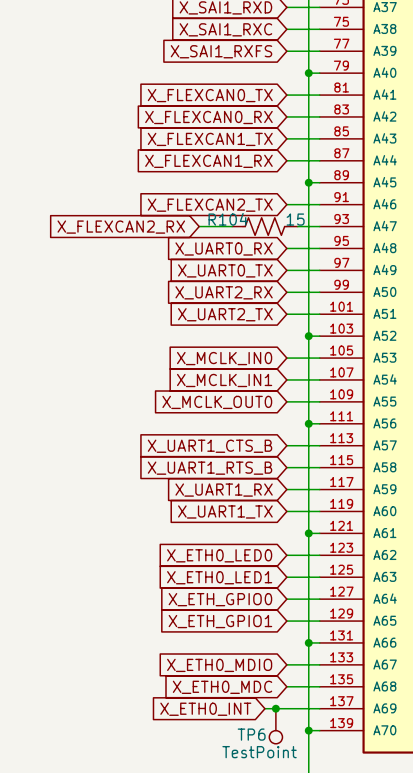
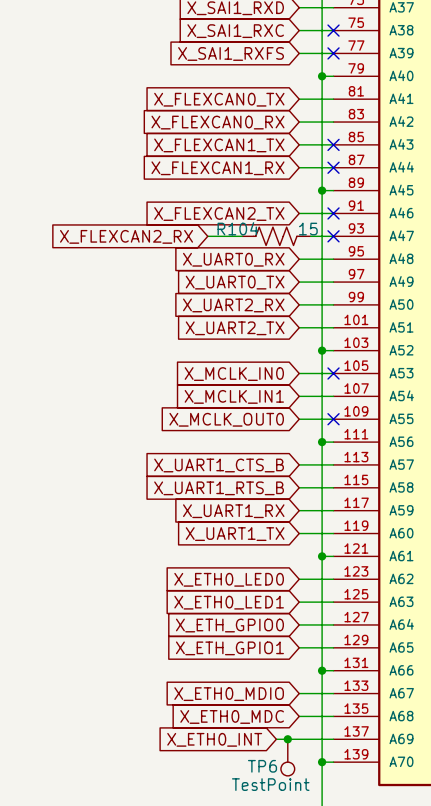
no-connect mark: none -> (333, 30)
no-connect mark: none -> (333, 53)
no-connect mark: none -> (333, 144)
no-connect mark: none -> (333, 167)
no-connect mark: none -> (333, 213)
no-connect mark: none -> (333, 236)
no-connect mark: none -> (333, 373)
no-connect mark: none -> (333, 419)

